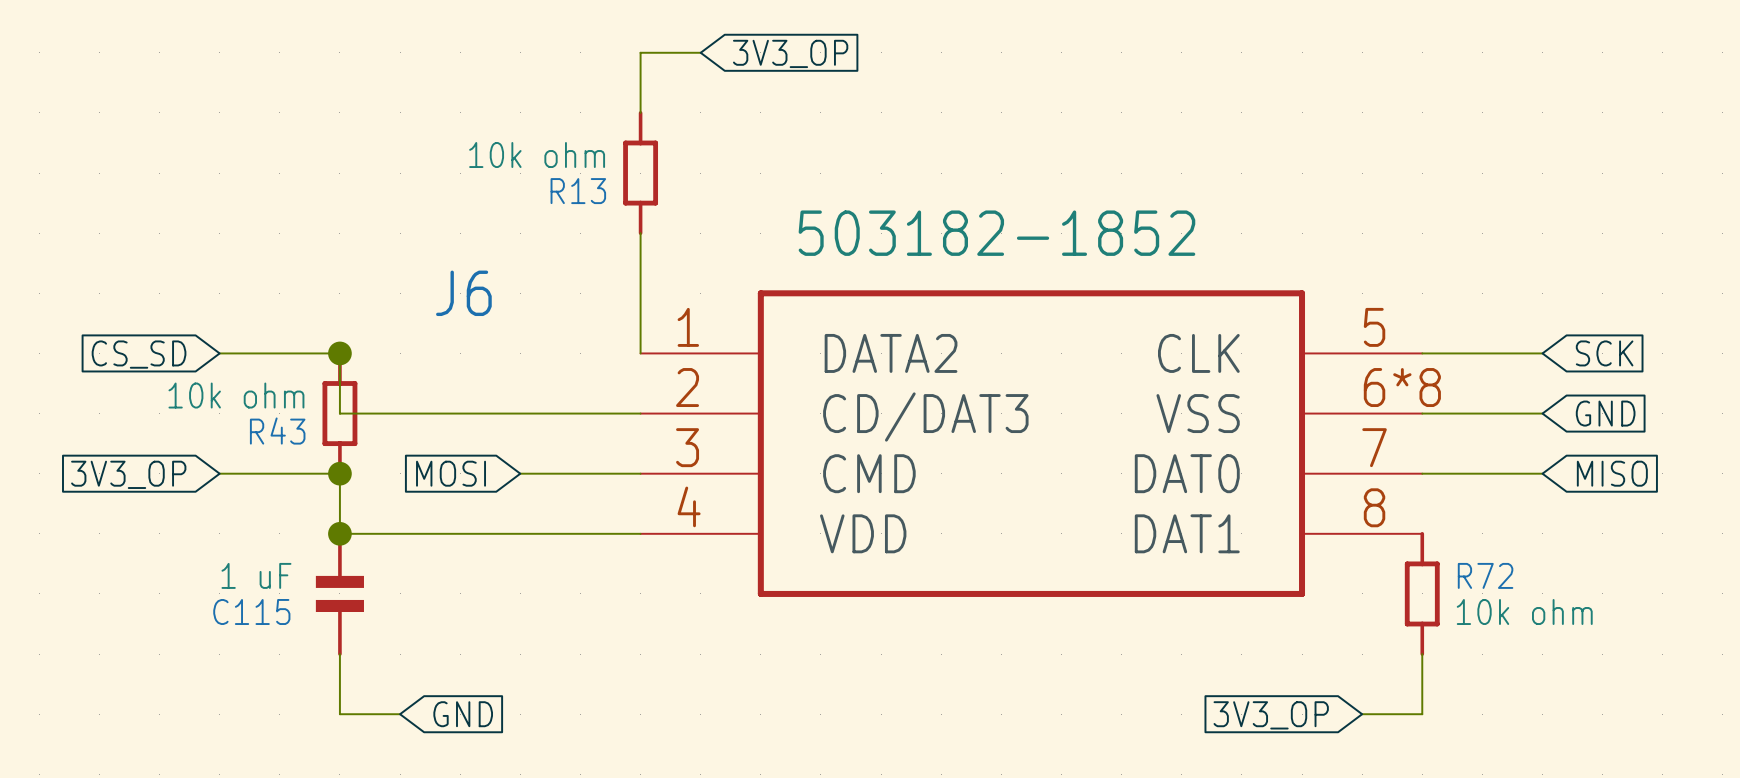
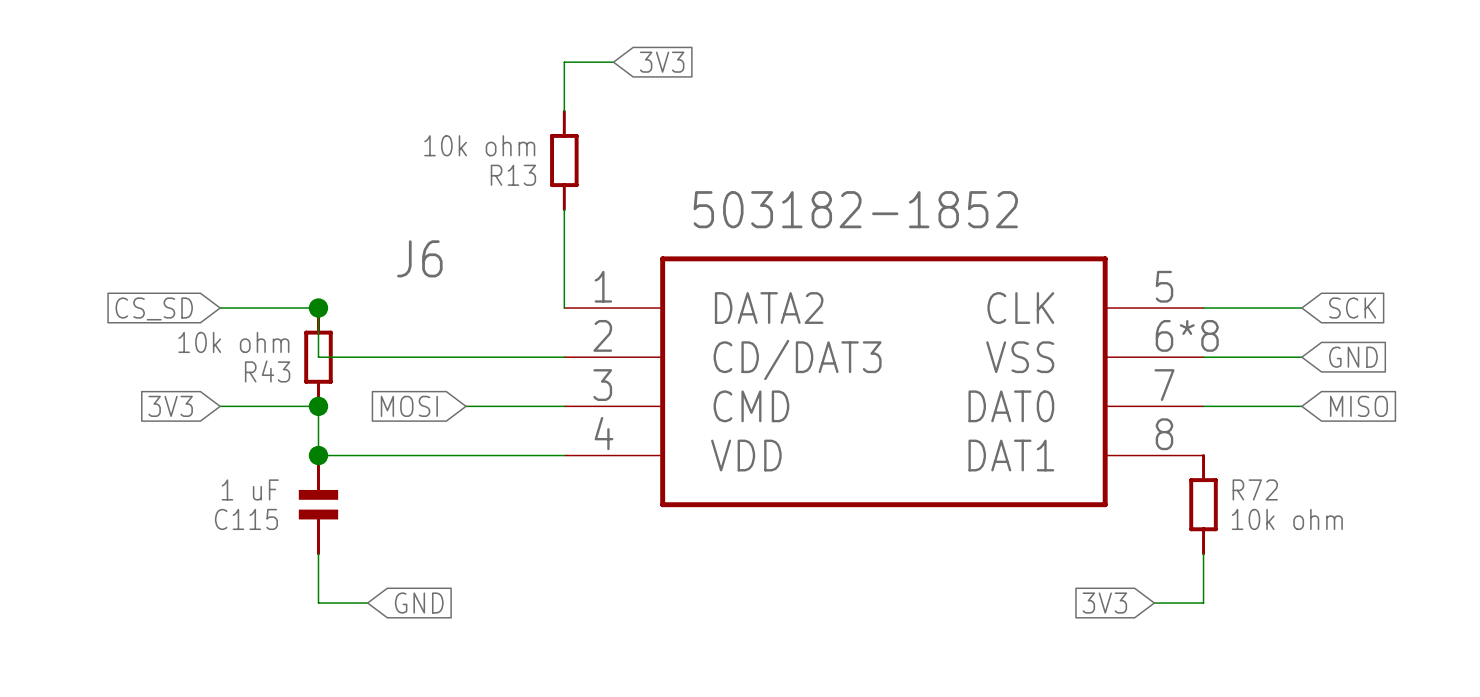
global label: 3V3_OP (790, 53) -> 3V3 (662, 62)
global label: 3V3_OP (128, 474) -> 3V3 (170, 406)
global label: 3V3_OP (1271, 715) -> 3V3 (1104, 603)

